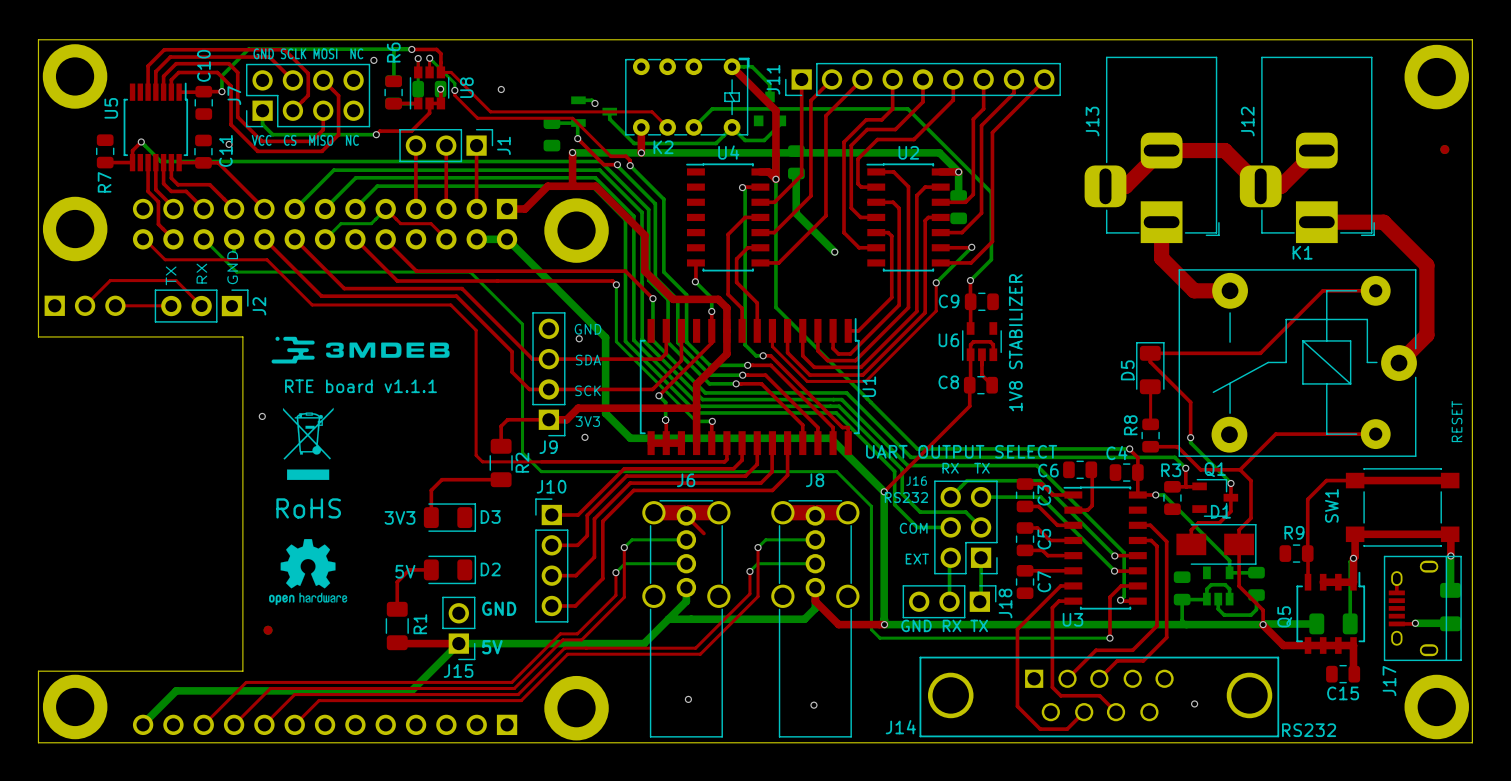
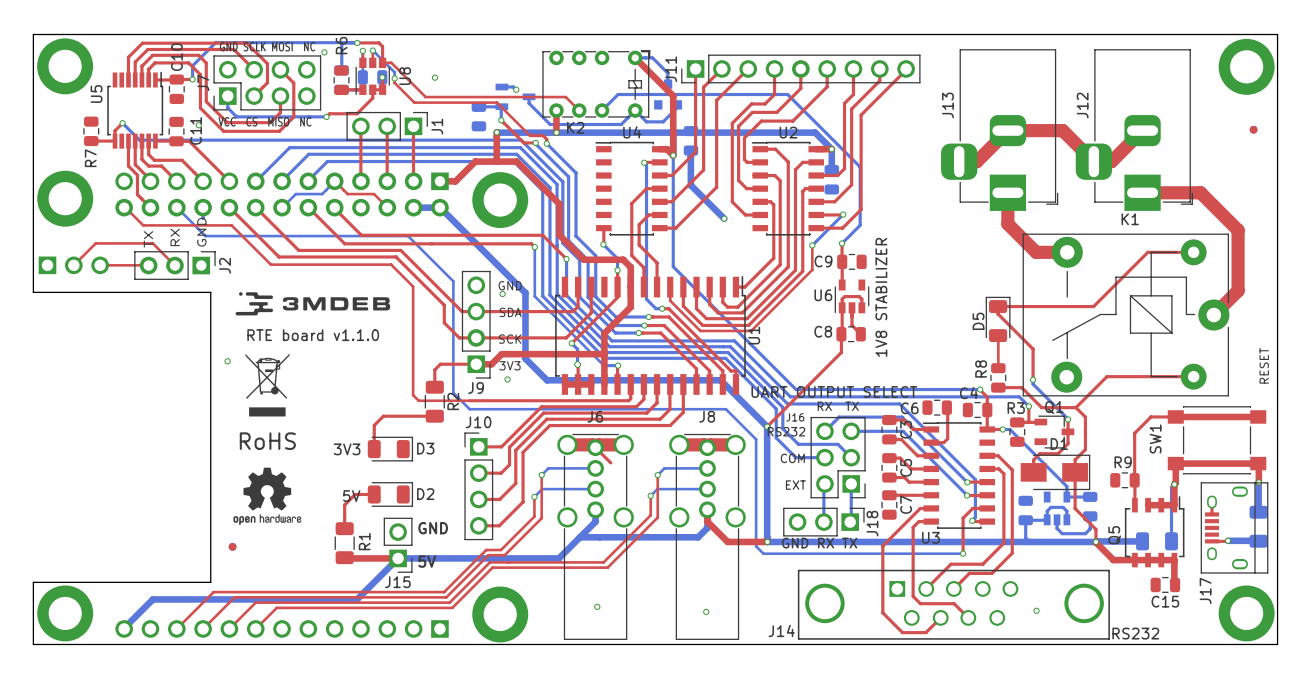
text: RTE board v1.1.1 (360, 386) -> RTE board v1.1.0 (313, 335)

